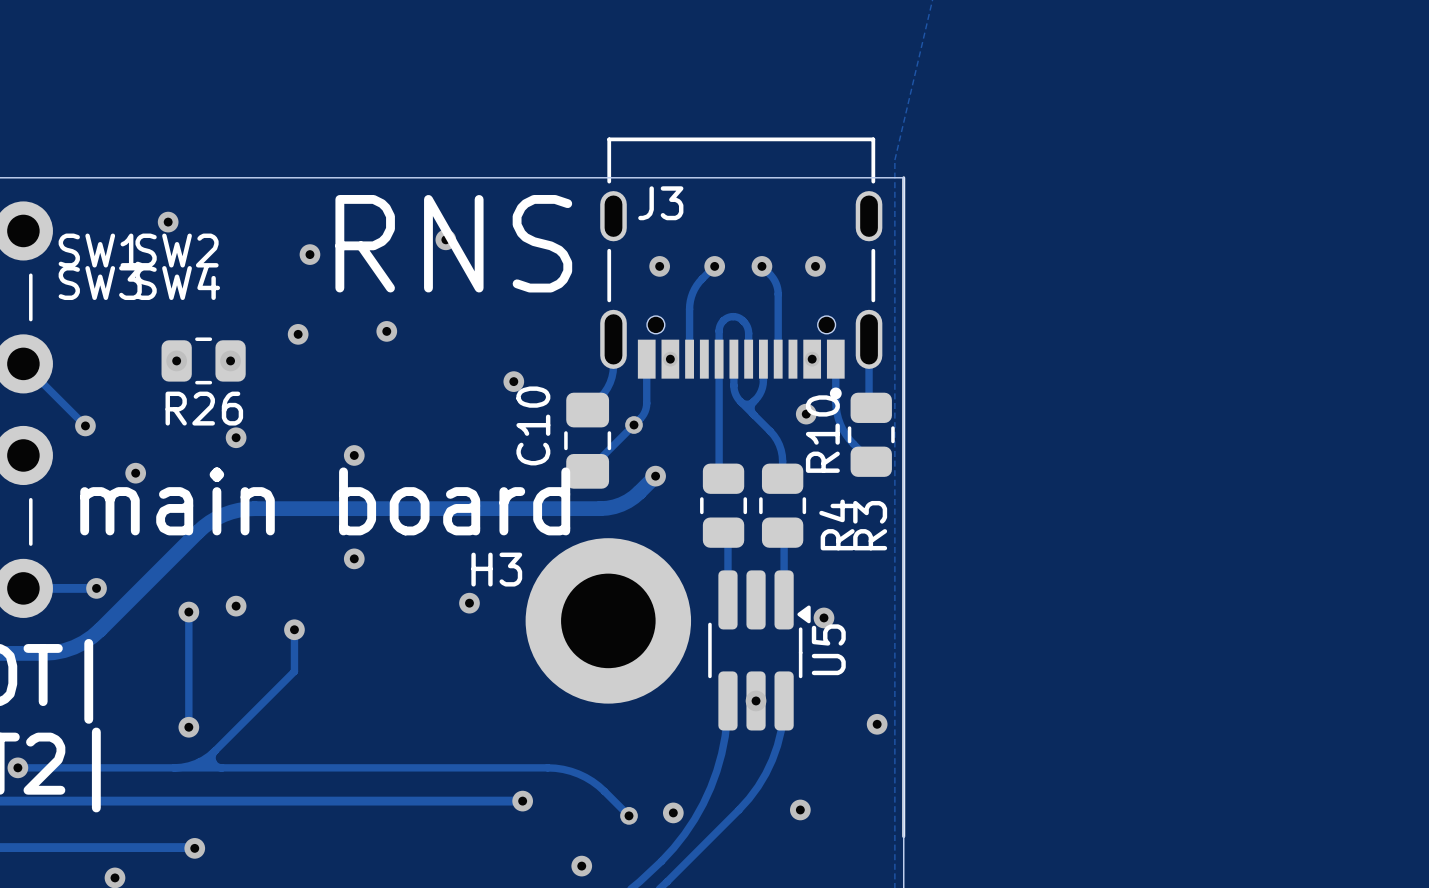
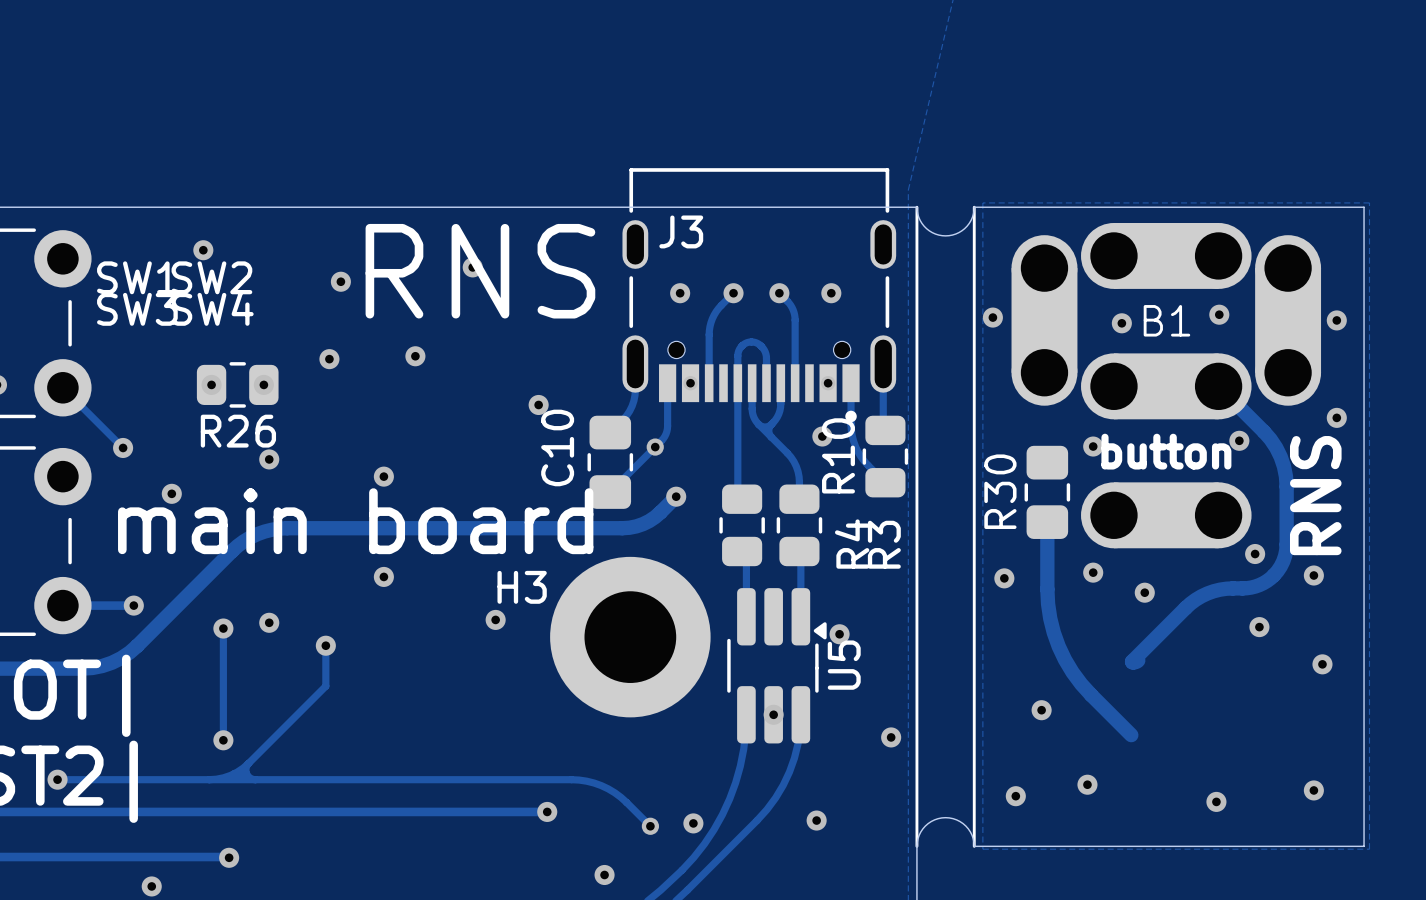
zone outline: none -> (982, 202) (982, 849) (1369, 849) (1369, 202) (982, 202)
board edge: (903, 177) (903, 836) -> (916, 207) (918, 217) (924, 226) (932, 232) (945, 235) (955, 234) (964, 228) (970, 220) (974, 207) (1364, 207) (1364, 846) (974, 846) (972, 835) (965, 826) (956, 819) (945, 817) (934, 819) (925, 826) (919, 835) (916, 846)
line: none -> (974, 207) (974, 846)
via: none -> (1219, 314)
via: none -> (992, 317)
via: none -> (1336, 320)
via: none -> (1121, 323)
B1: none -> (1166, 385)
track: none -> (1218, 386) (1263, 431) (1280, 456) (1286, 486) (1285, 555) (1277, 571) (1263, 583) (1251, 587) (1219, 589) (1195, 599) (1132, 661) (1138, 660)
via: none -> (1336, 417)
via: none -> (1239, 440)
via: none -> (1093, 446)
text: none -> button (1166, 451)
R30: none -> (1047, 492)
text: none -> RNS (1315, 495)
track: none -> (1047, 522) (1048, 603) (1058, 646) (1081, 684) (1131, 735)
via: none -> (1255, 554)
via: none -> (1093, 572)
via: none -> (1313, 575)
via: none -> (1004, 578)
via: none -> (1144, 592)
via: none -> (1259, 627)
via: none -> (1322, 664)
via: none -> (1041, 710)
via: none -> (1087, 784)
via: none -> (1313, 790)
via: none -> (1015, 796)
via: none -> (1216, 801)

